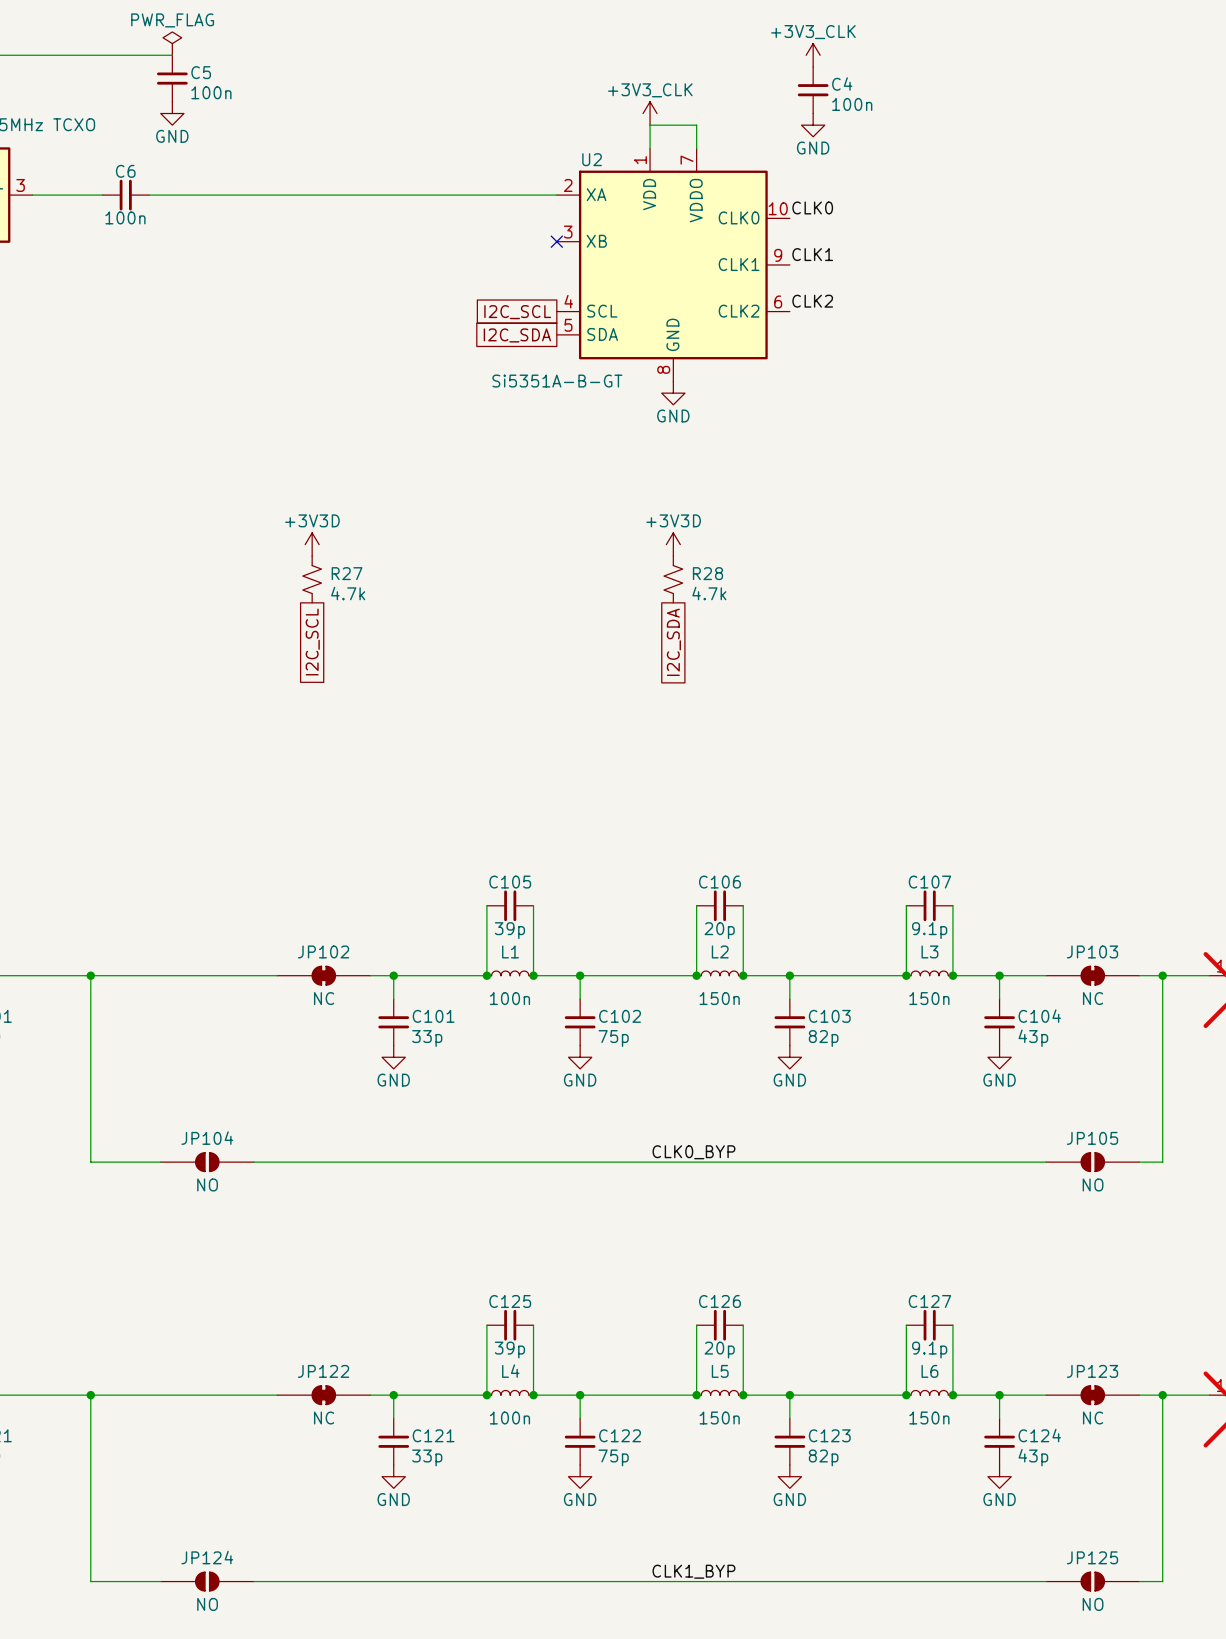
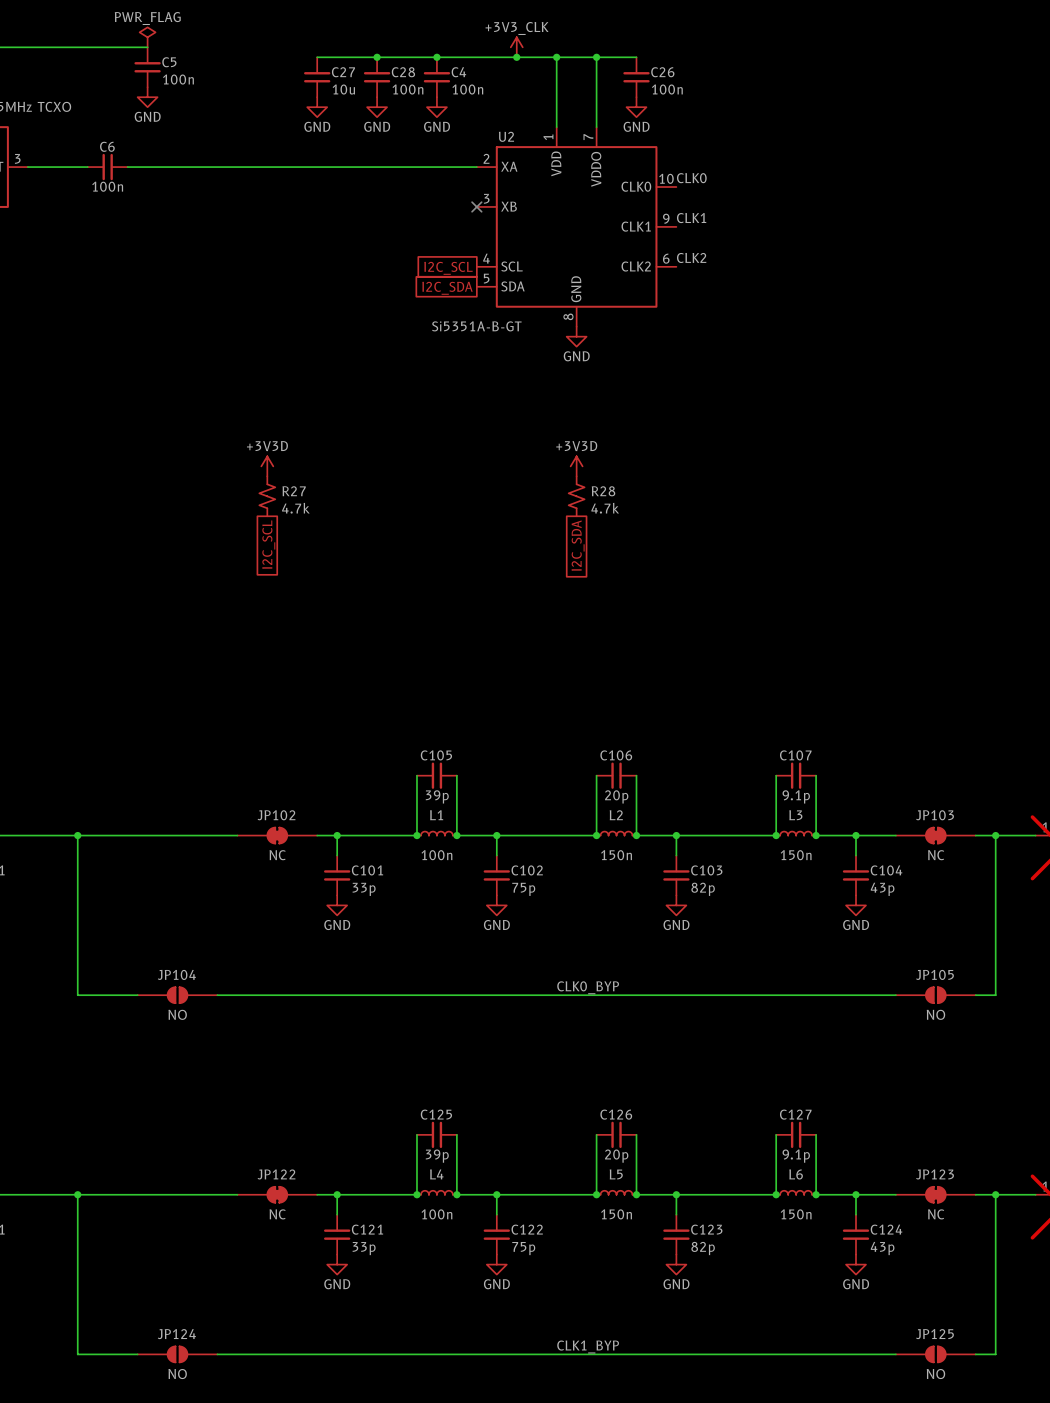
power symbol: +3V3_CLK (813, 55) -> none
wire: none -> (317, 57) (636, 57)
junction: none -> (377, 57)
junction: none -> (436, 57)
junction: none -> (516, 57)
junction: none -> (556, 57)
wire: none -> (596, 57) (596, 107)
junction: none -> (596, 57)
C27: none -> 10u (317, 77)
C28: none -> 100n (377, 77)
C26: none -> 100n (636, 77)
C4 position: (813, 90) -> (436, 77)
power symbol position: +3V3_CLK (650, 113) -> +3V3_CLK (516, 47)
power symbol: none -> GND (317, 107)
power symbol: none -> GND (377, 107)
power symbol: none -> GND (436, 107)
wire: (650, 125) (696, 125) -> (556, 107) (556, 57)
power symbol position: GND (813, 125) -> GND (636, 107)

